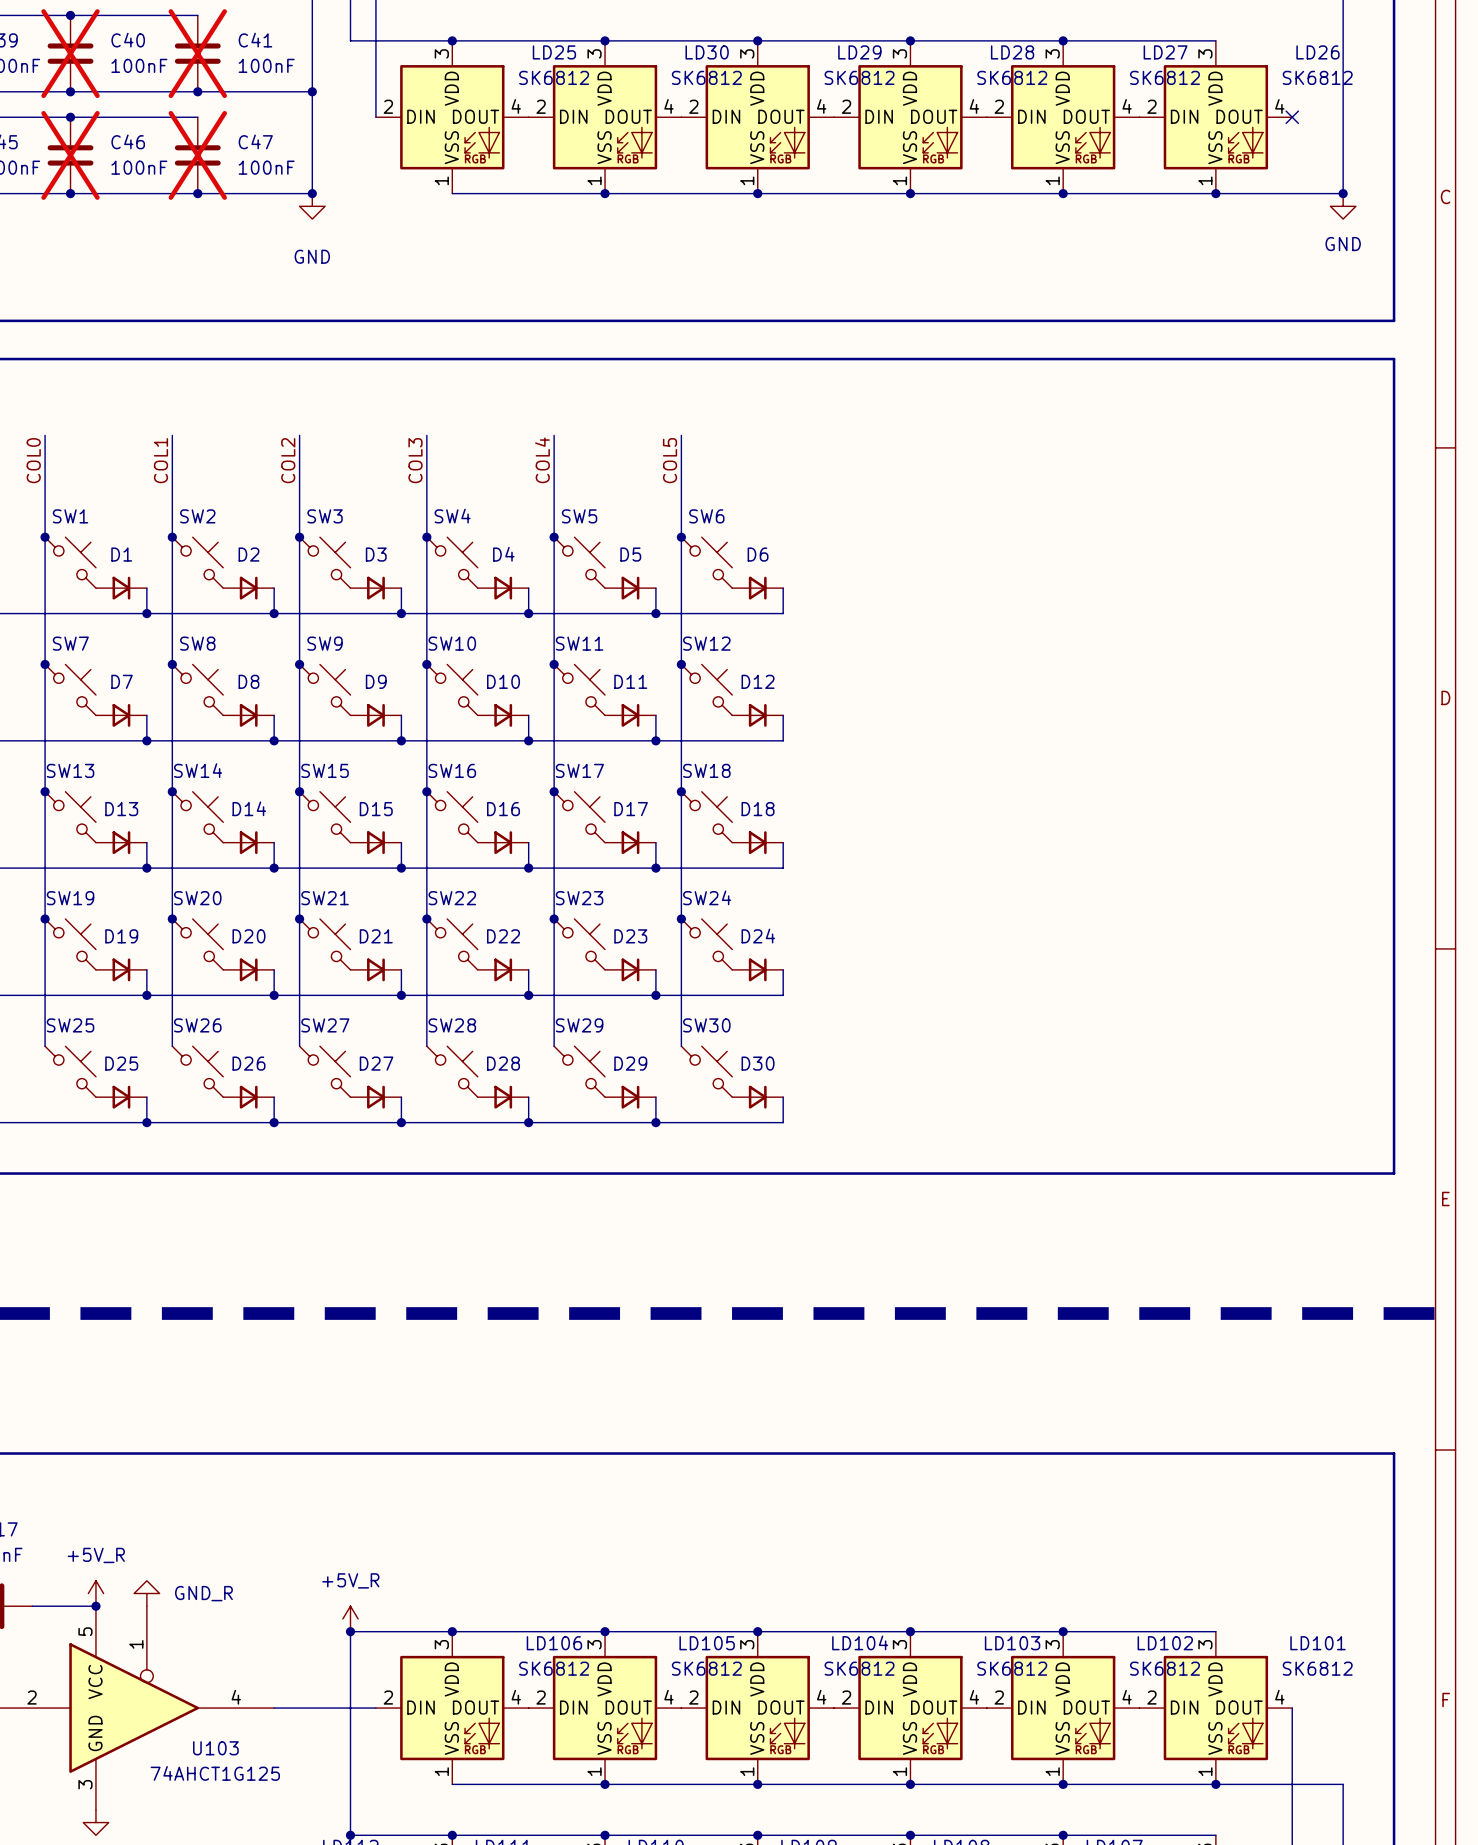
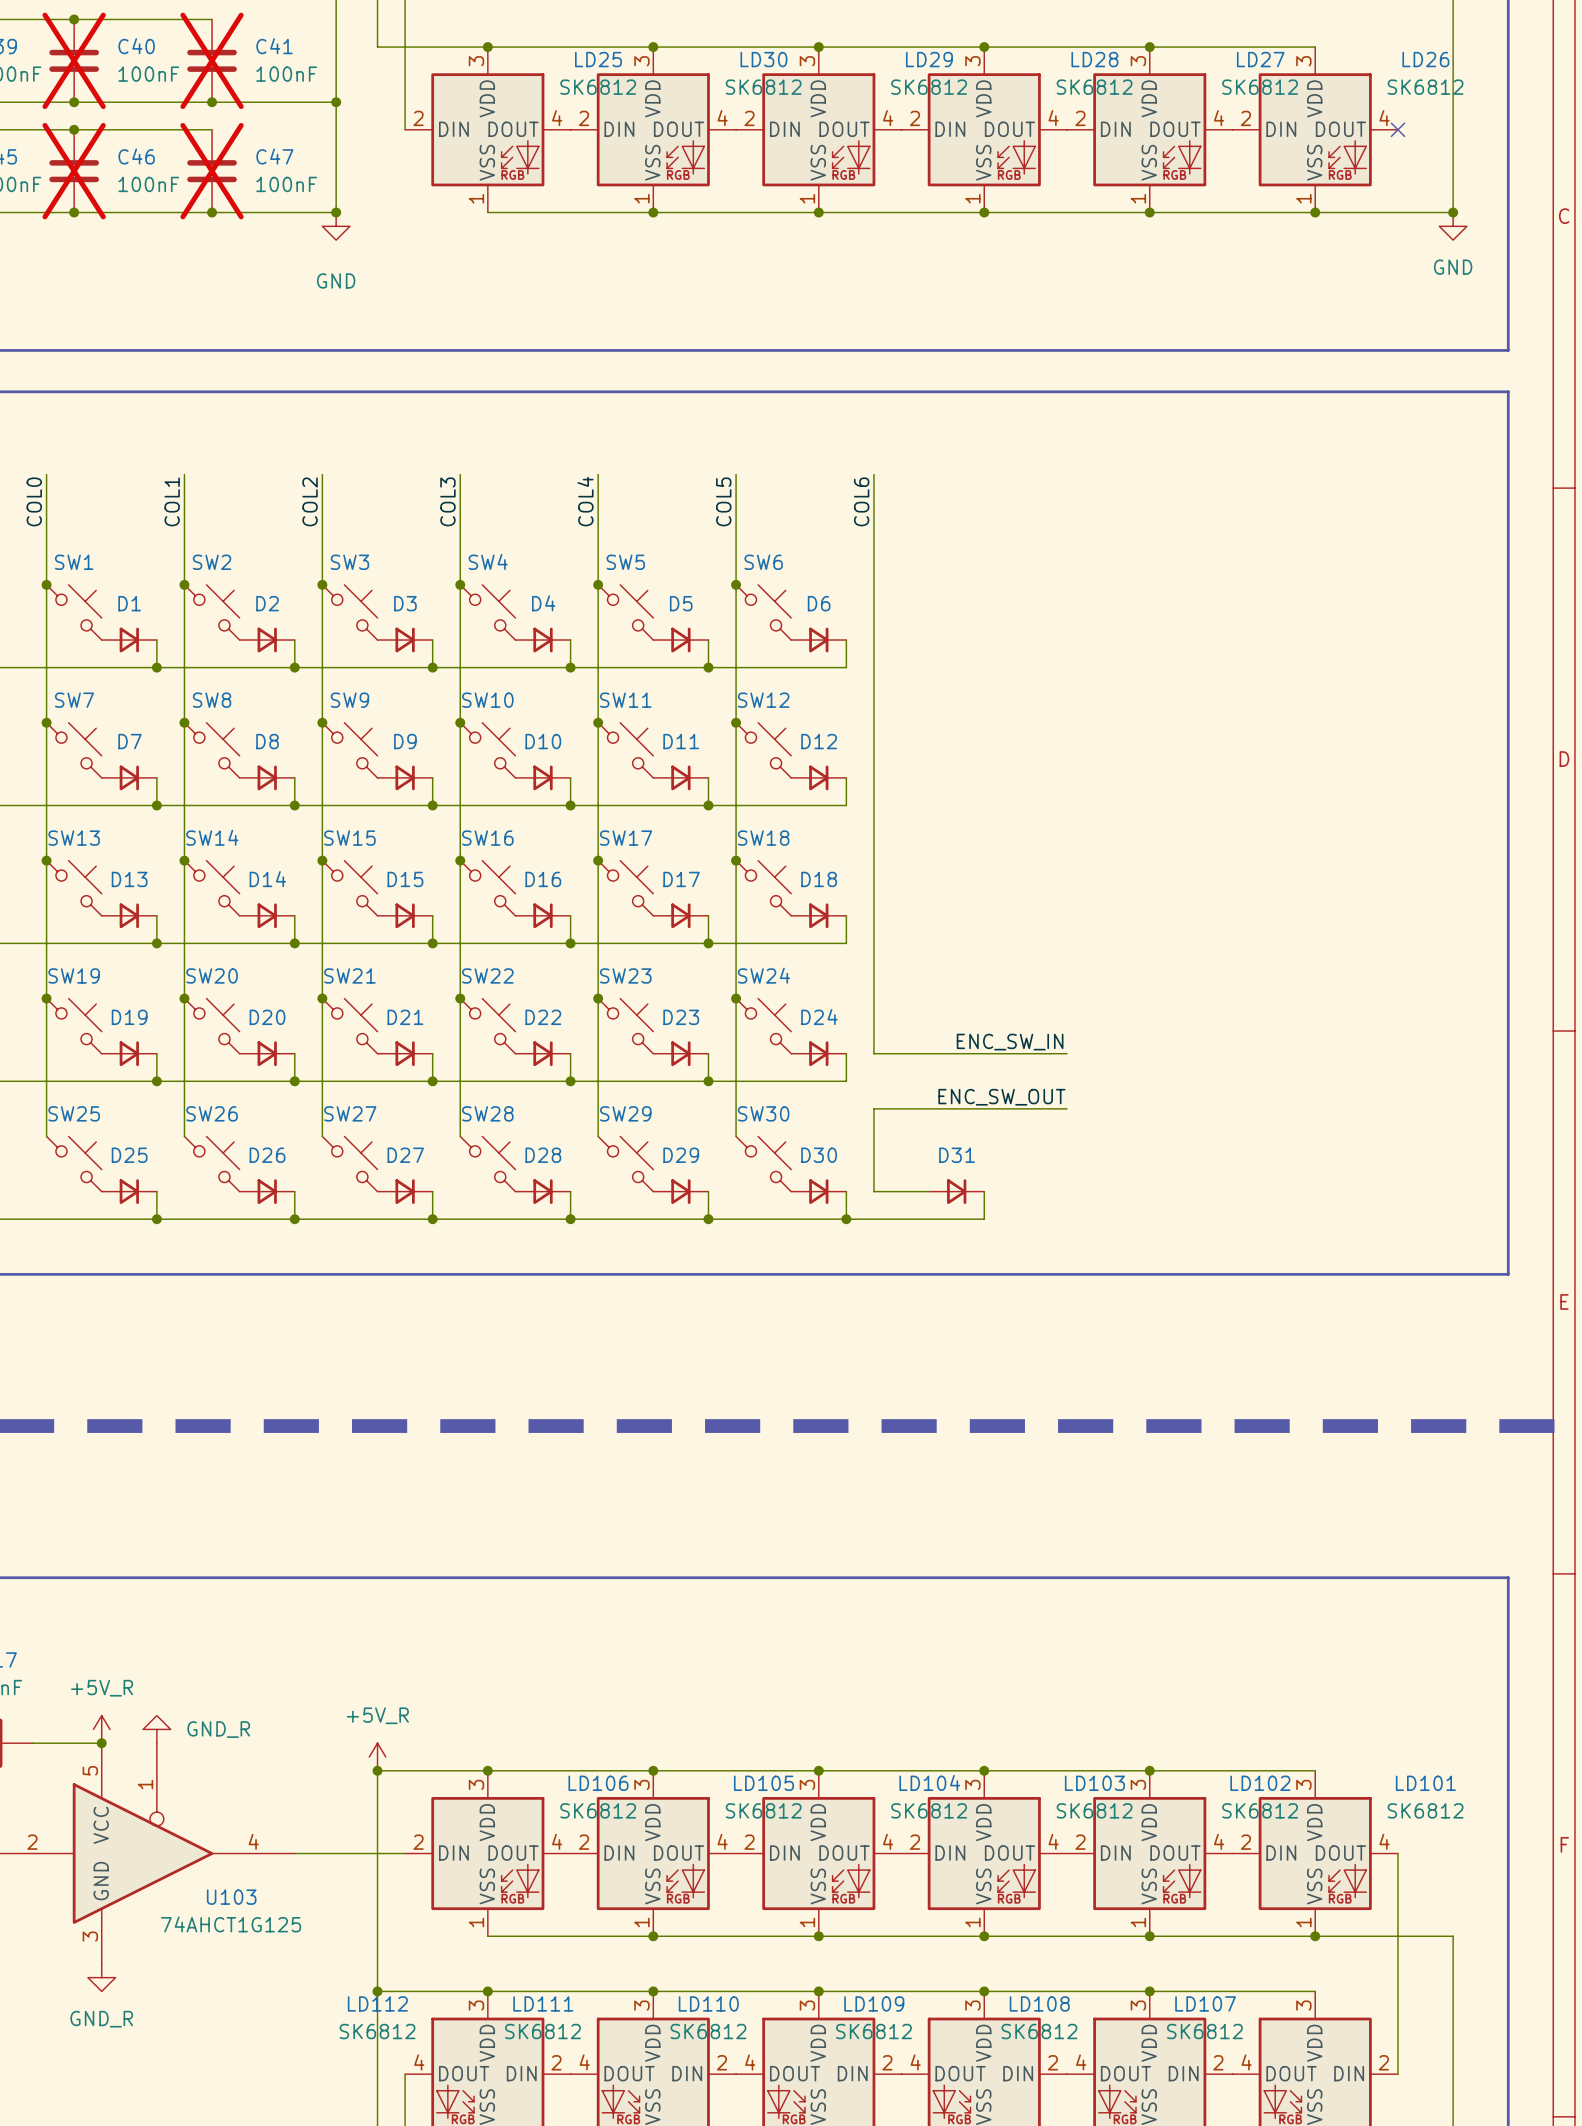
wire: none -> (873, 474) (873, 1053) (1067, 1053)
label: none -> COL6 (861, 501)
label: none -> ENC_SW_IN (1010, 1042)
label: none -> ENC_SW_OUT (1001, 1097)
wire: none -> (1067, 1108) (873, 1108) (873, 1191) (929, 1191)
D31: none -> (956, 1191)
wire: none -> (984, 1191) (984, 1219) (846, 1219)
junction: none -> (846, 1219)

